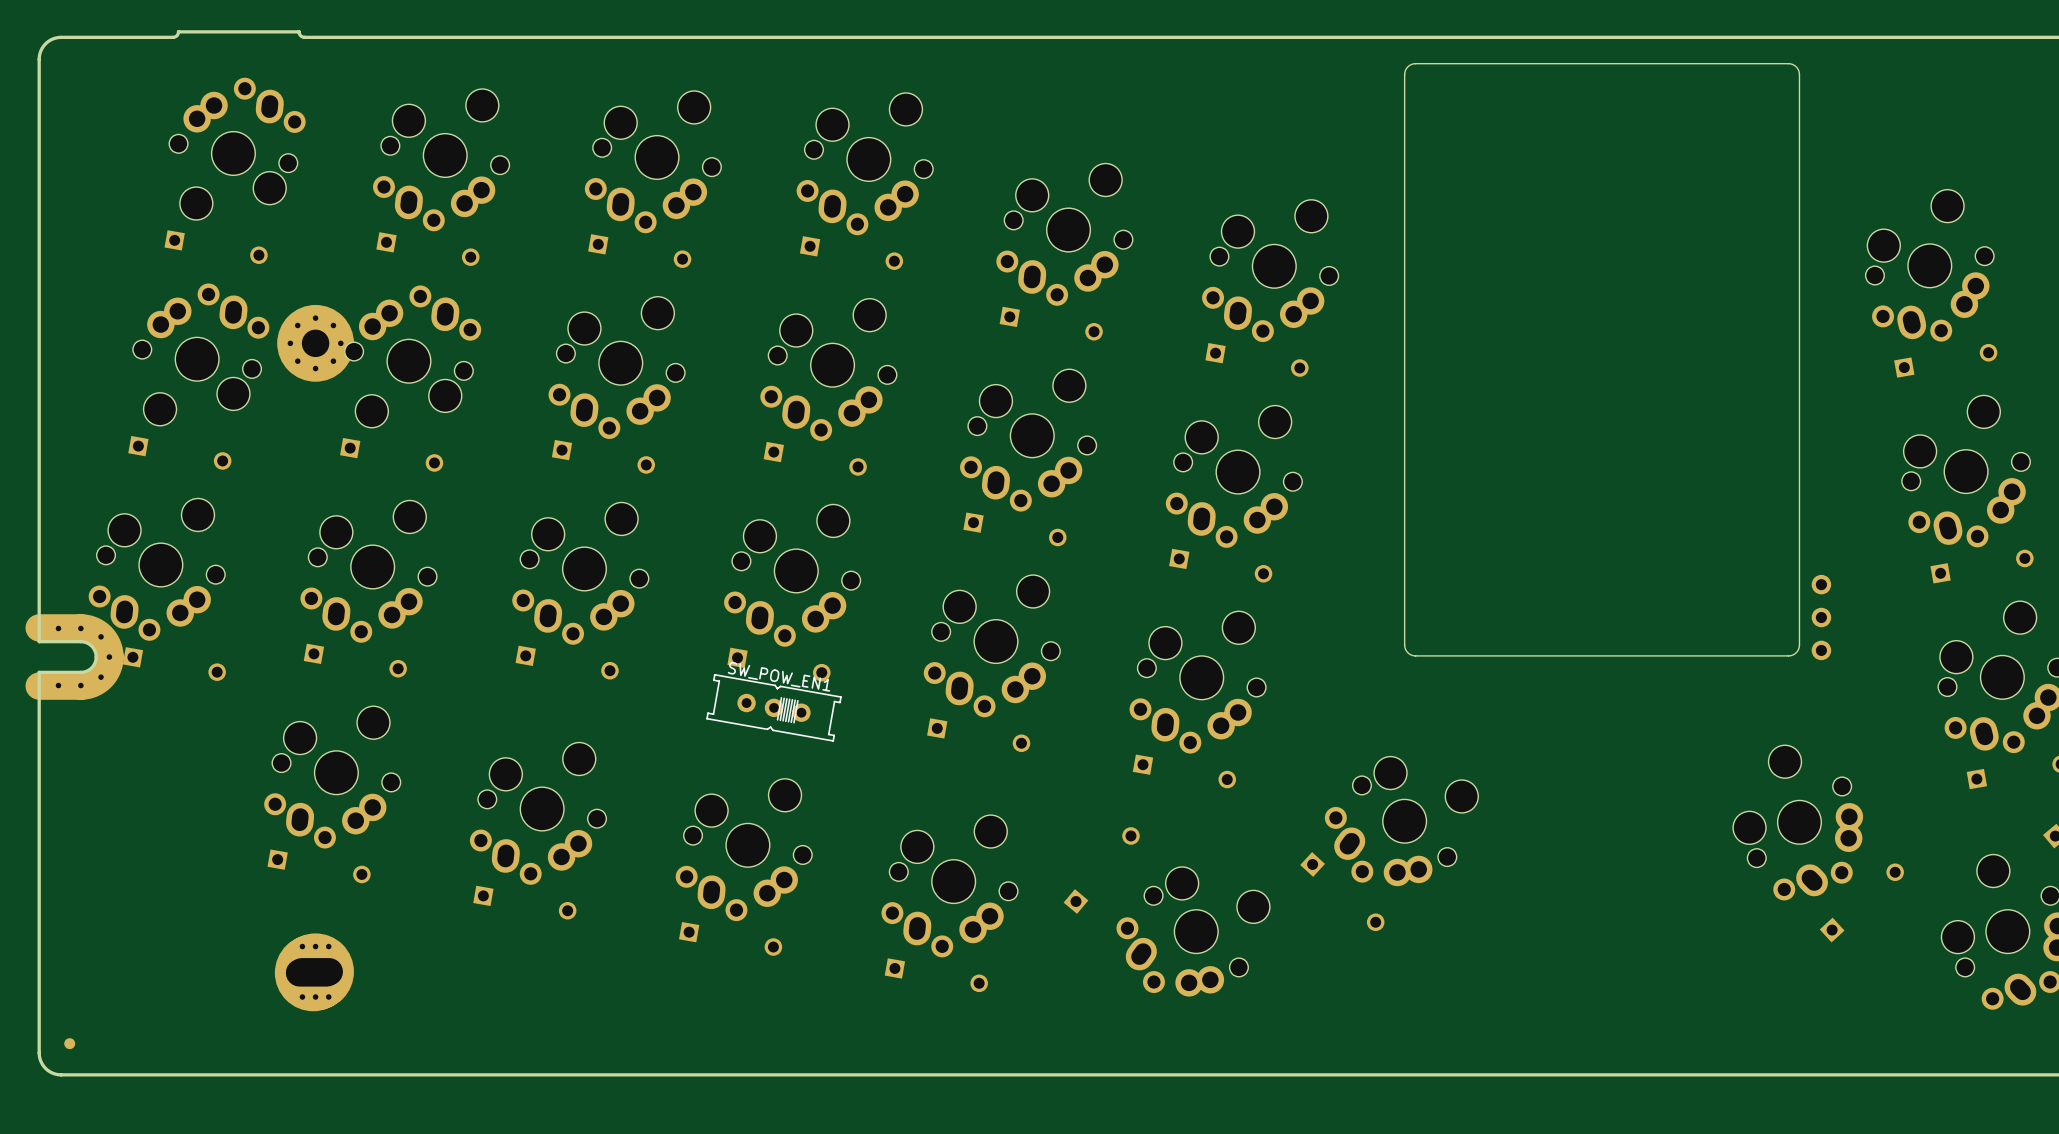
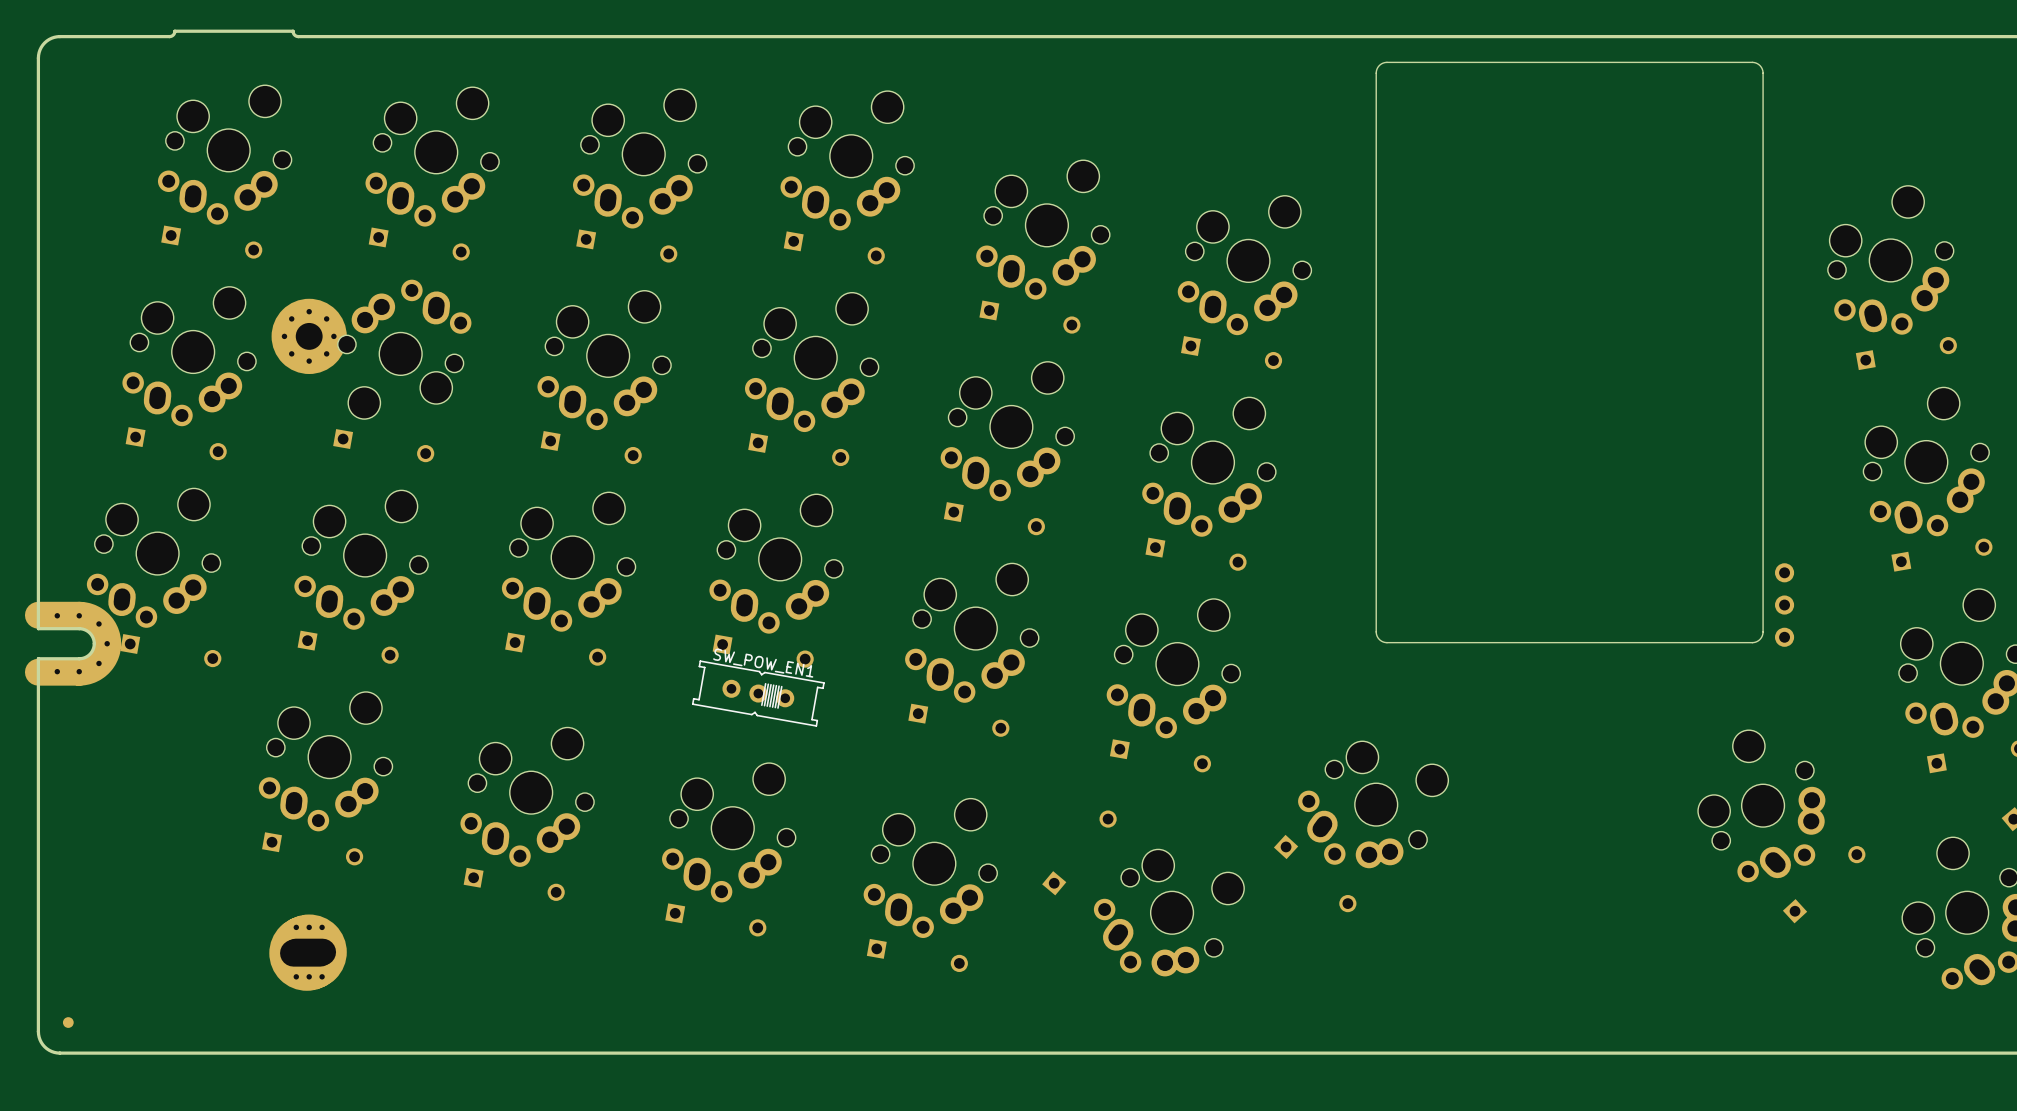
part rotation: 0° (237, 148) -> 180° (224, 154)
part rotation: 0° (201, 354) -> 180° (189, 356)

